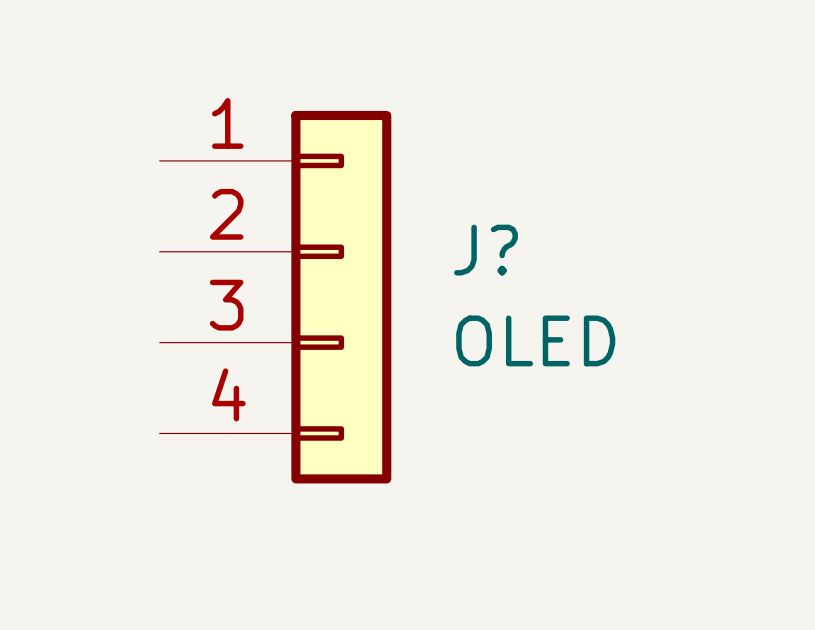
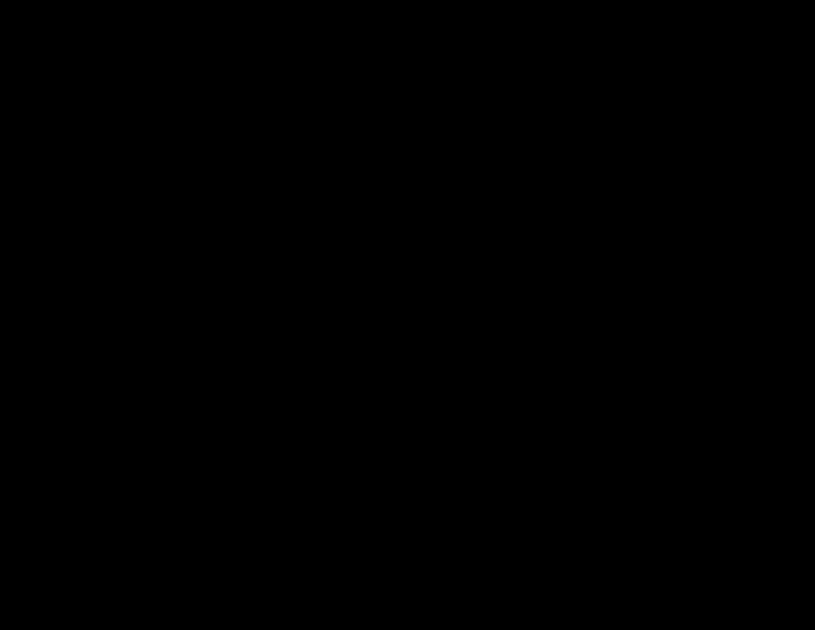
J?: OLED (275, 297) -> none

